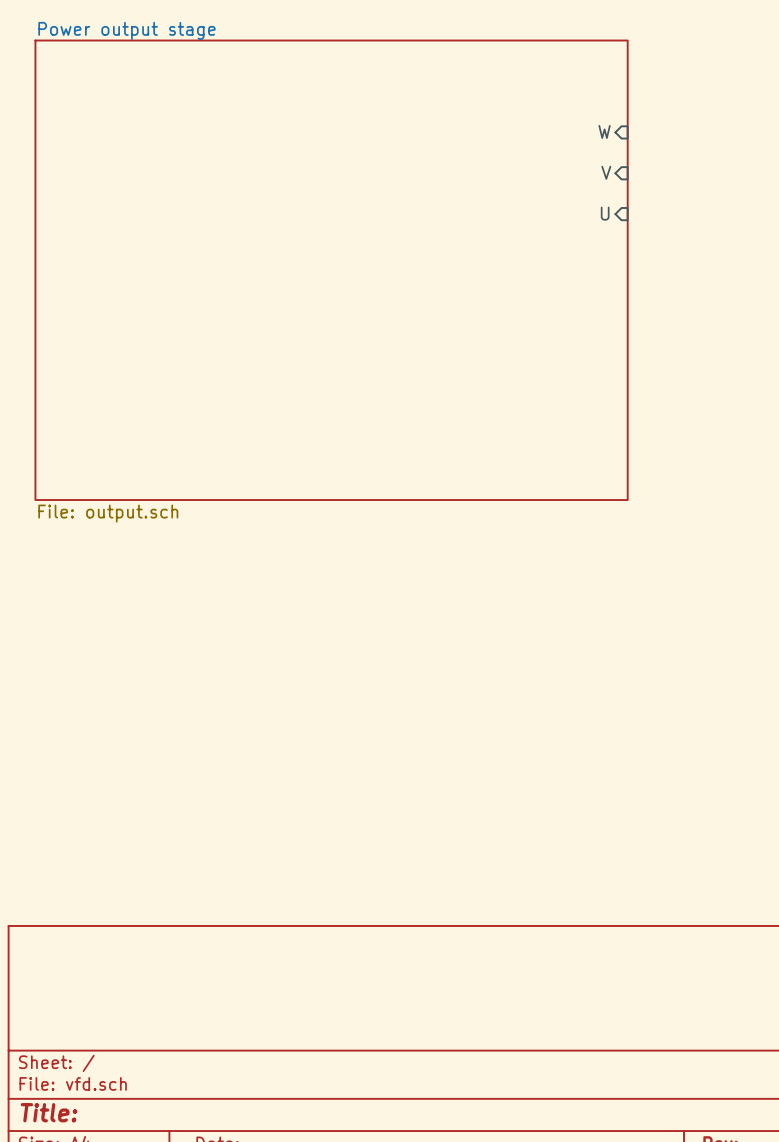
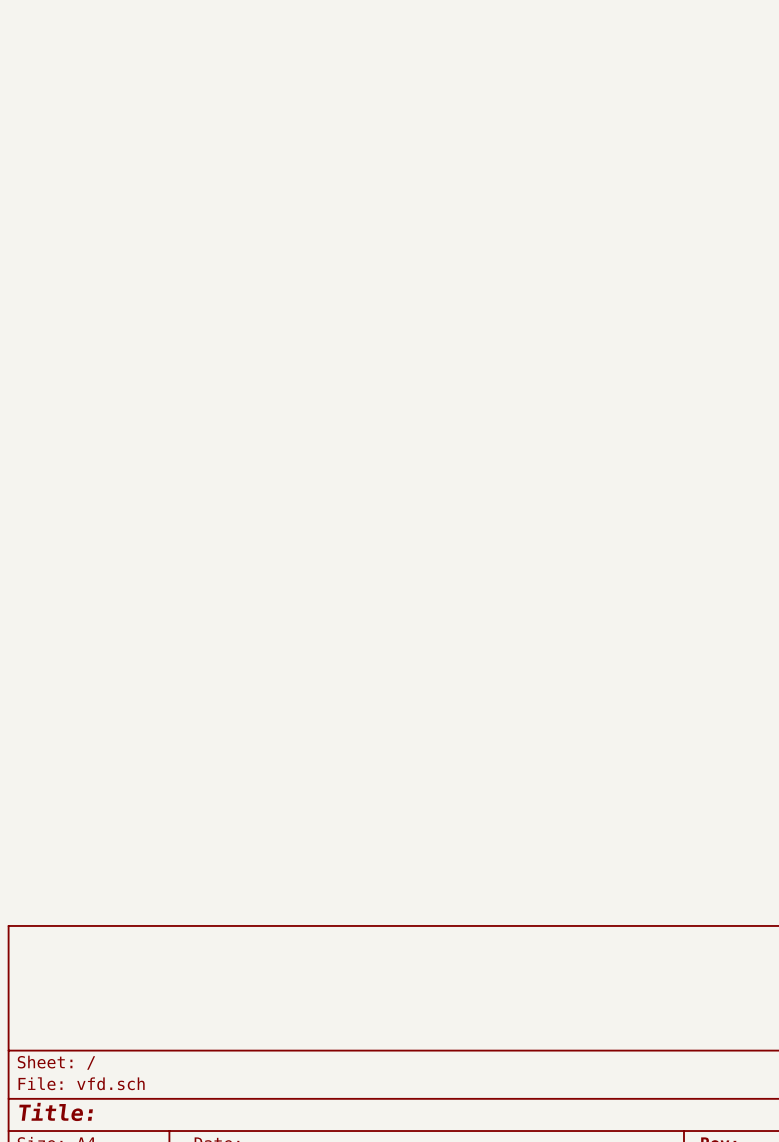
sheet pin: W (604, 131) -> none
sheet pin: V (606, 172) -> none
sheet pin: U (605, 213) -> none
sheet Power output stage: File: output.sch (331, 270) -> none

